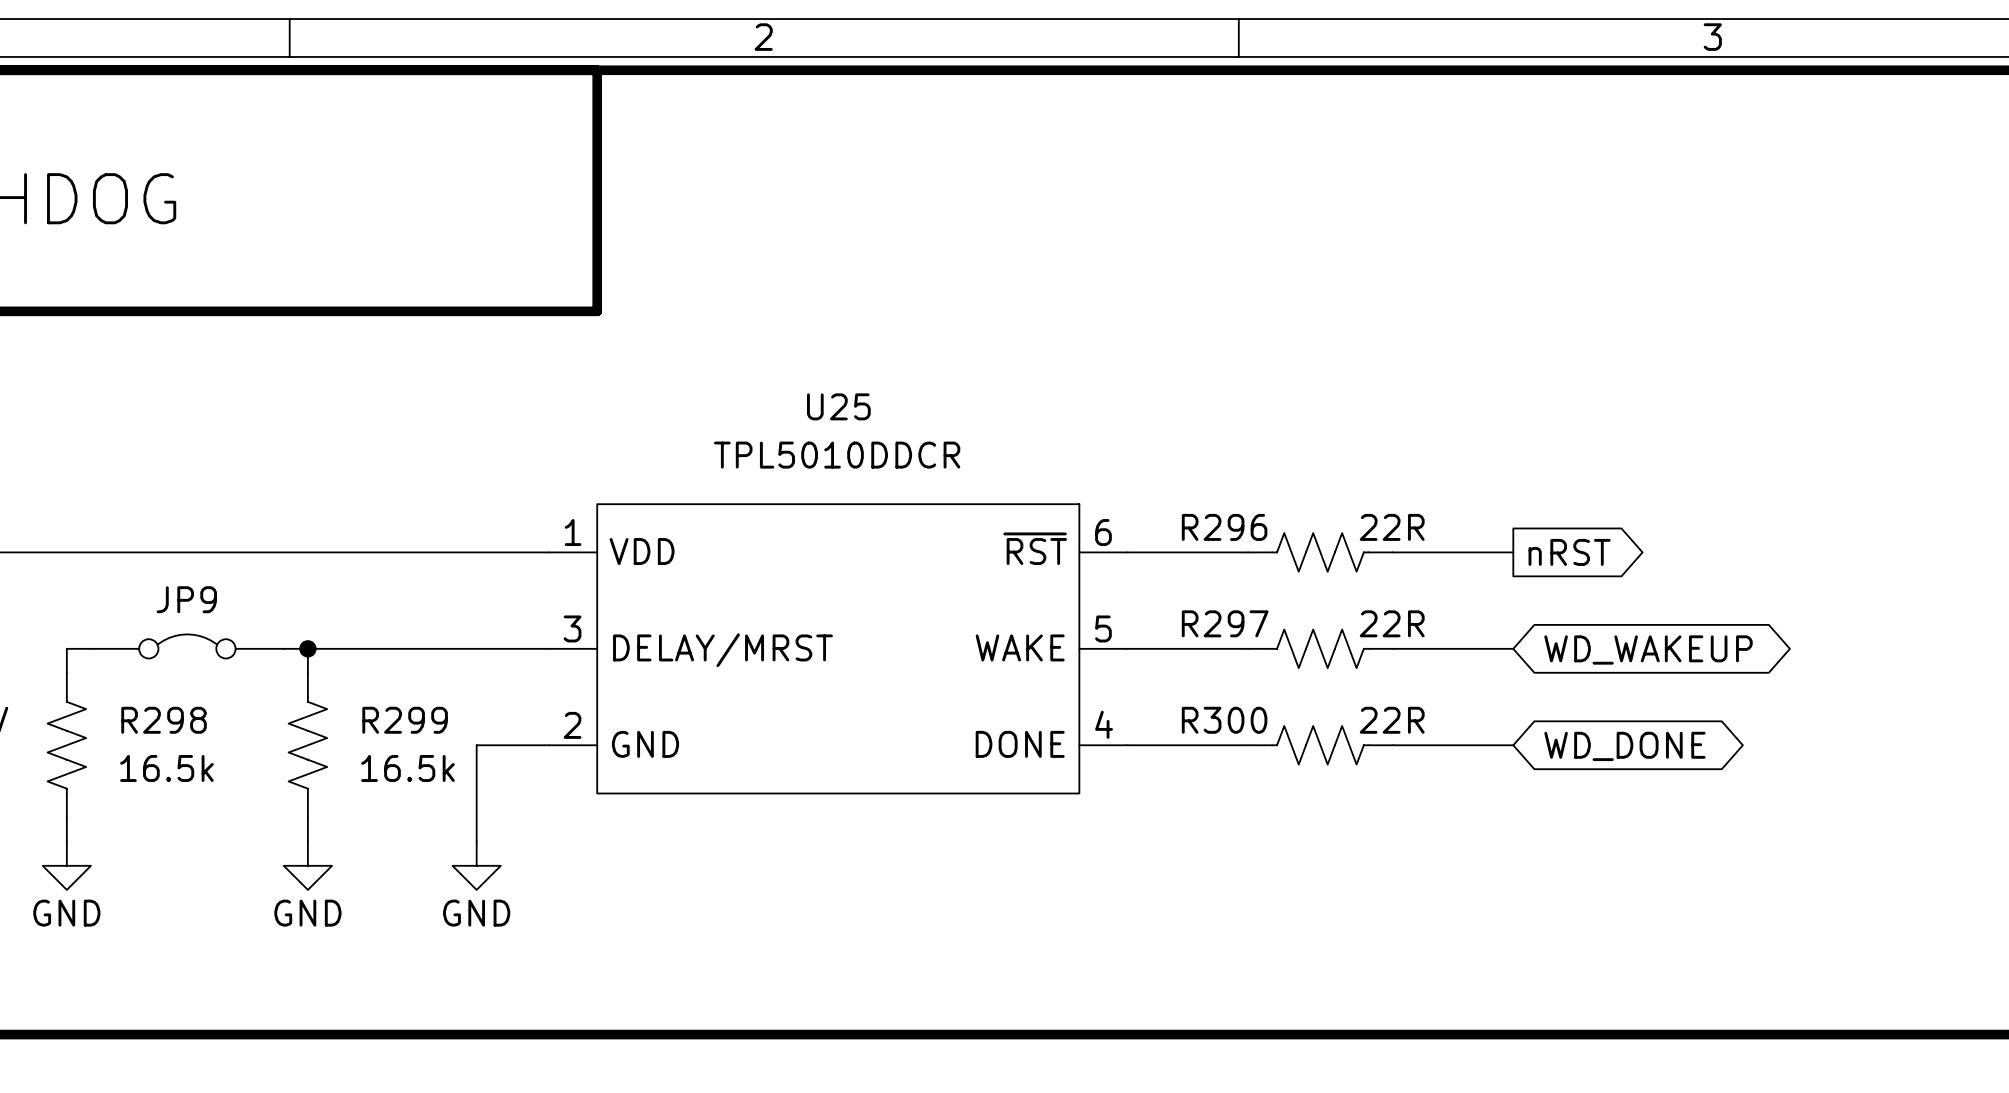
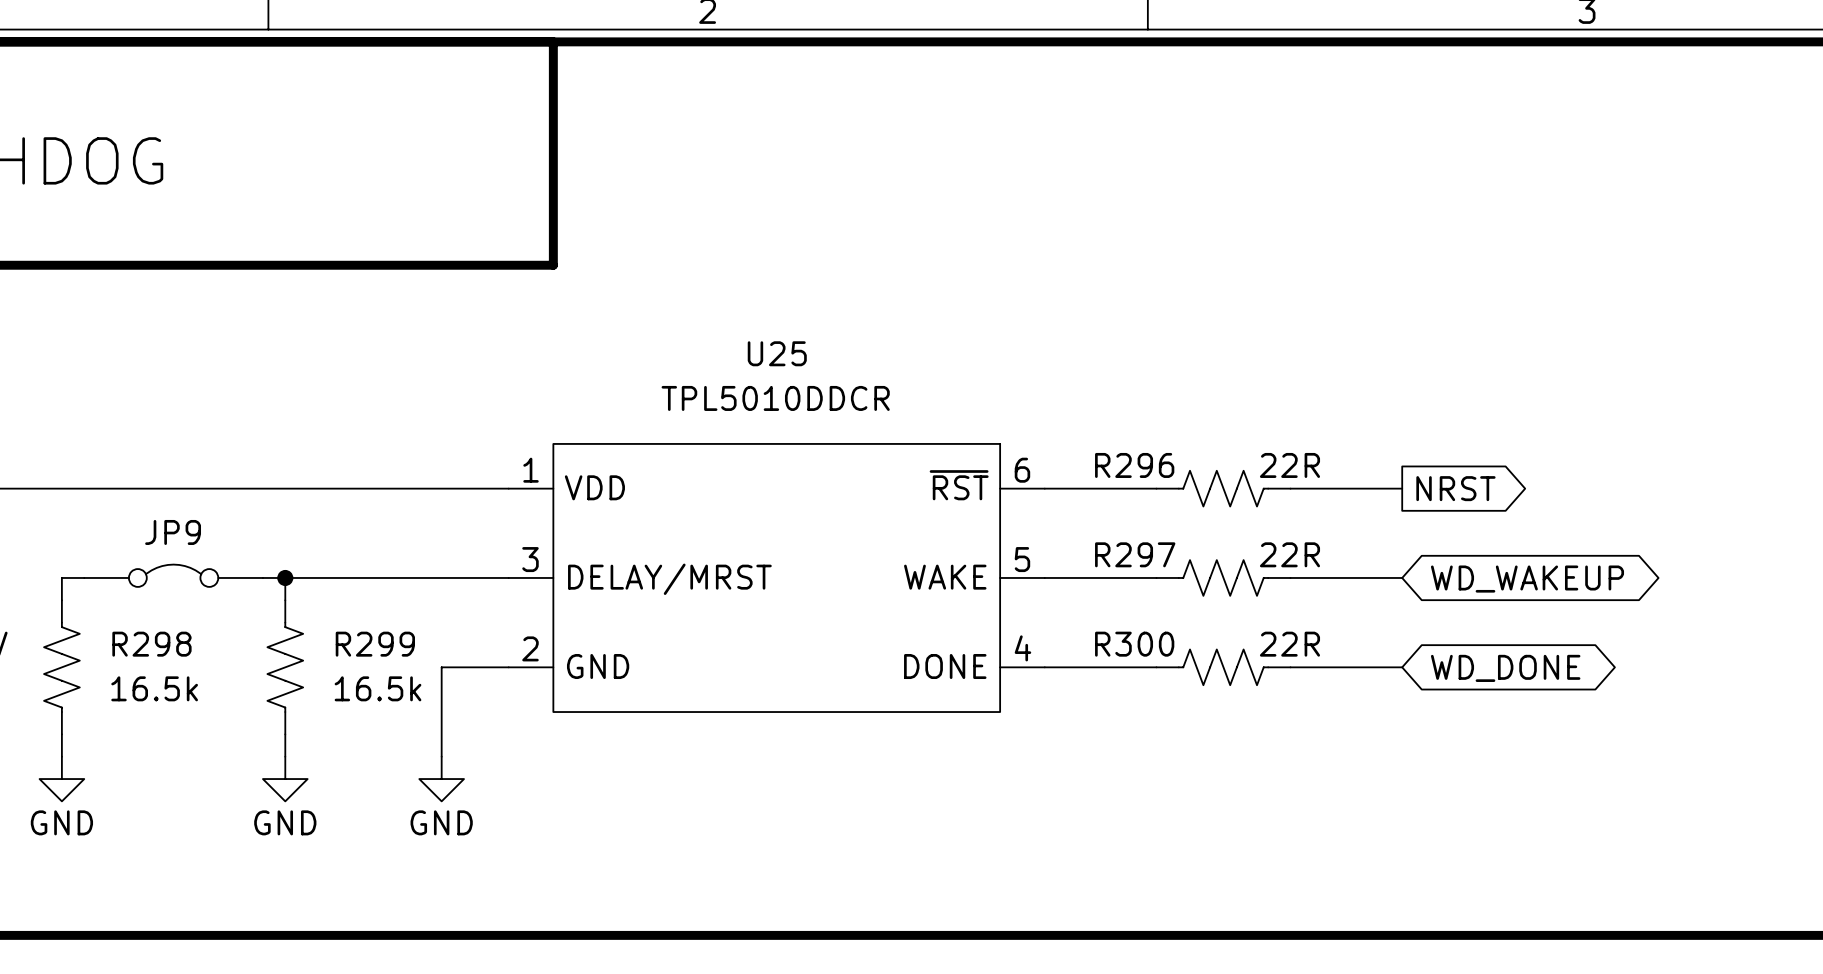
global label: nRST (1569, 552) -> NRST (1455, 488)

